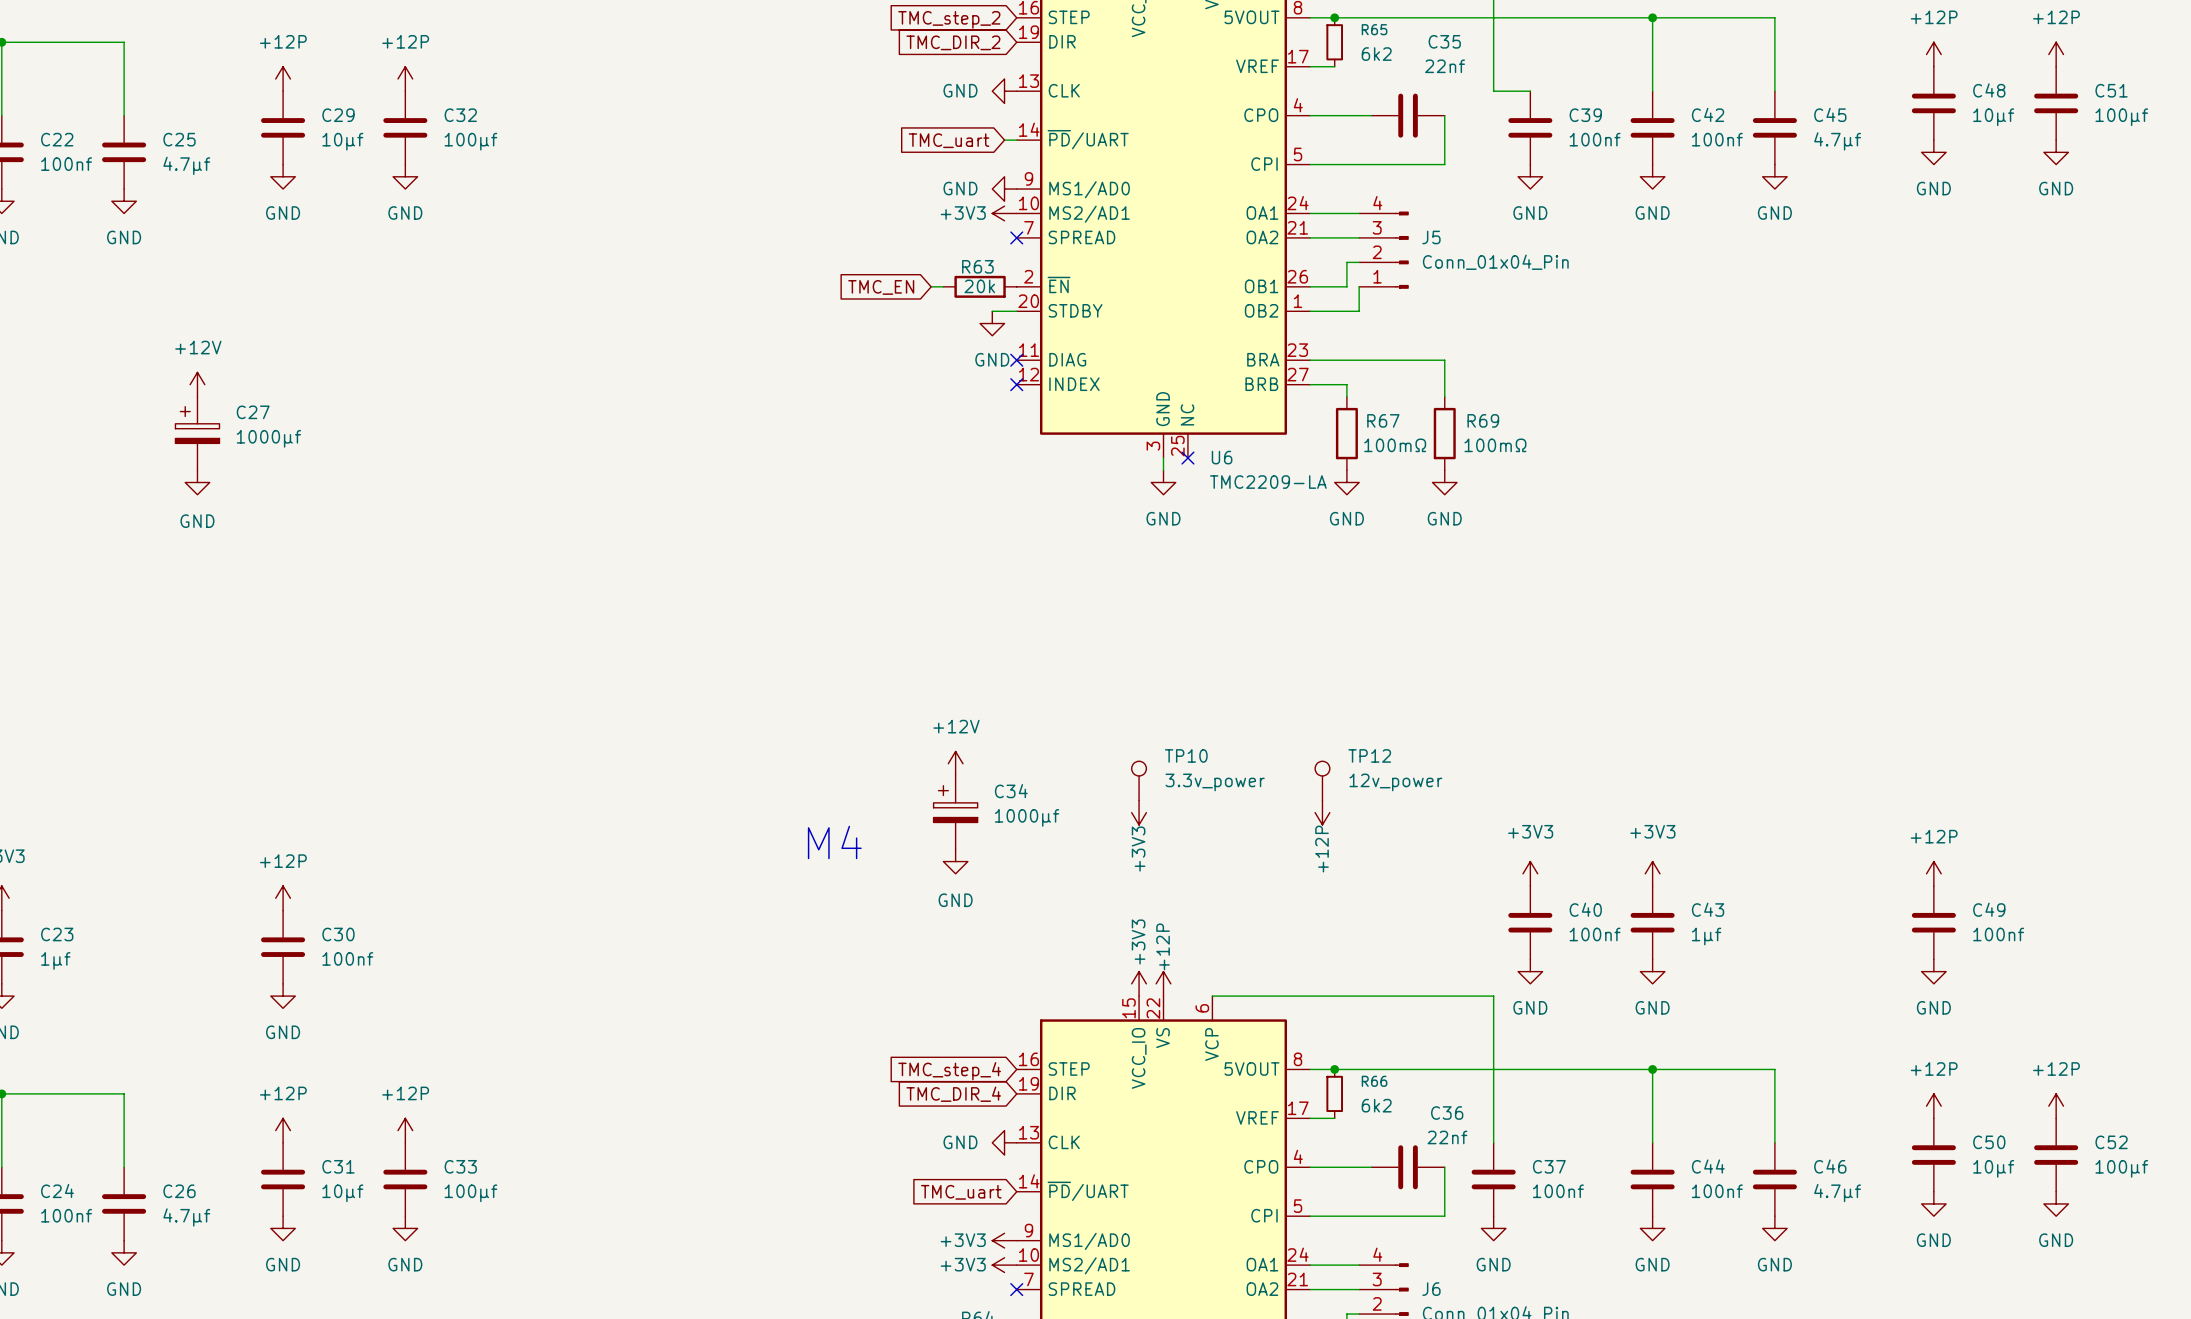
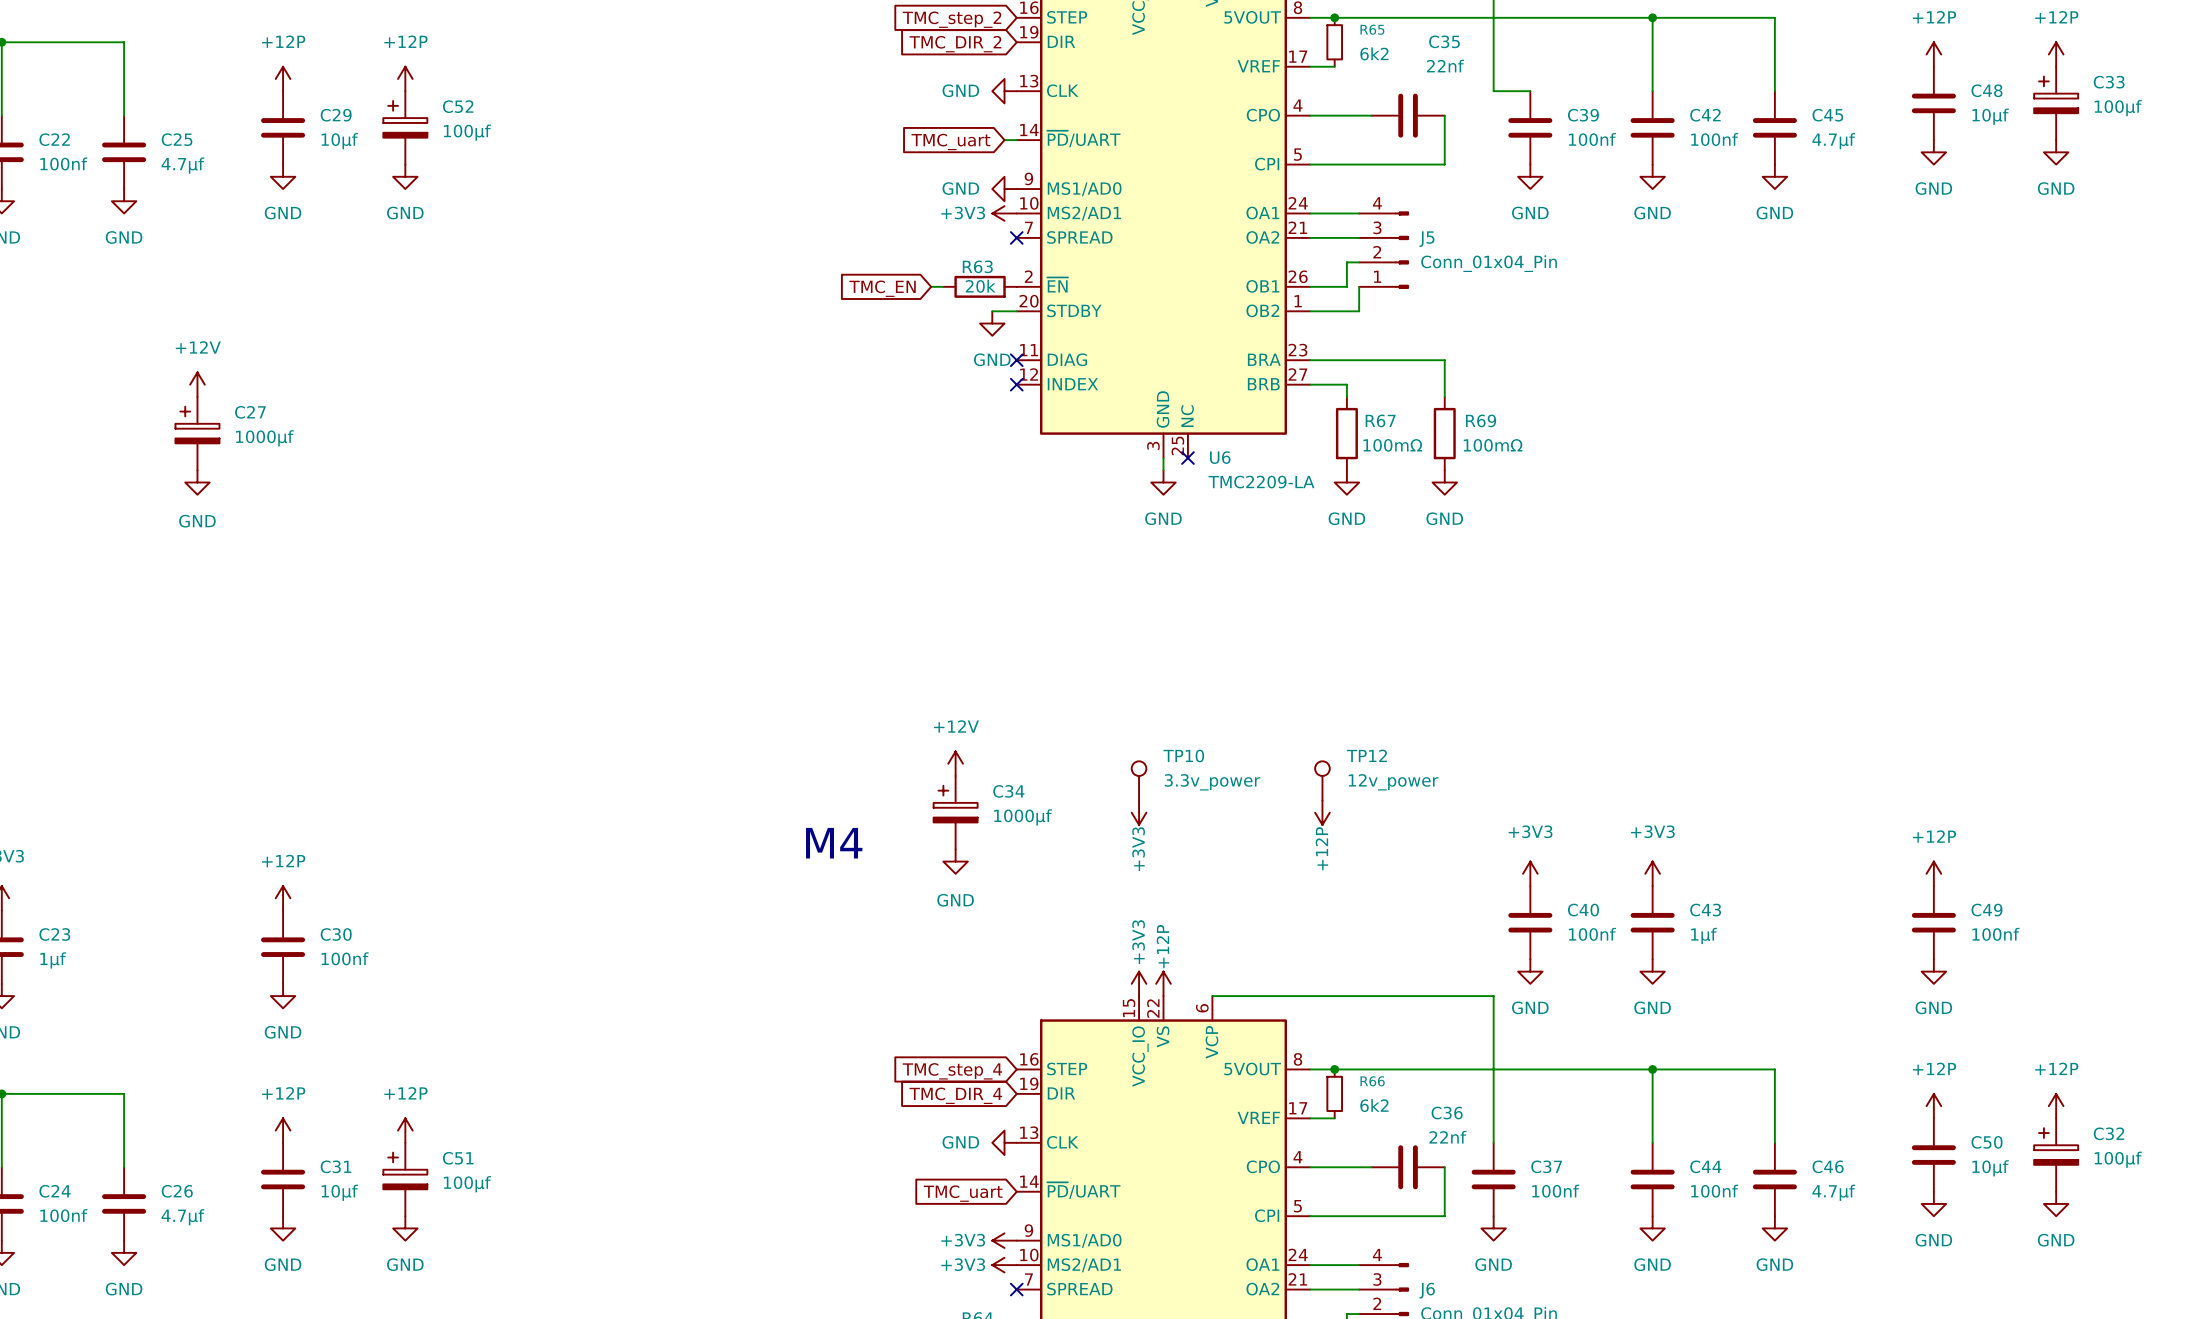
C51 symbol: [2034, 66, 2079, 141] -> [383, 1142, 428, 1217]
C32 symbol: [383, 91, 428, 165] -> [2034, 1118, 2079, 1192]
C52 symbol: [2034, 1118, 2079, 1192] -> [383, 91, 428, 165]
C33 symbol: [383, 1142, 428, 1217] -> [2034, 66, 2079, 141]

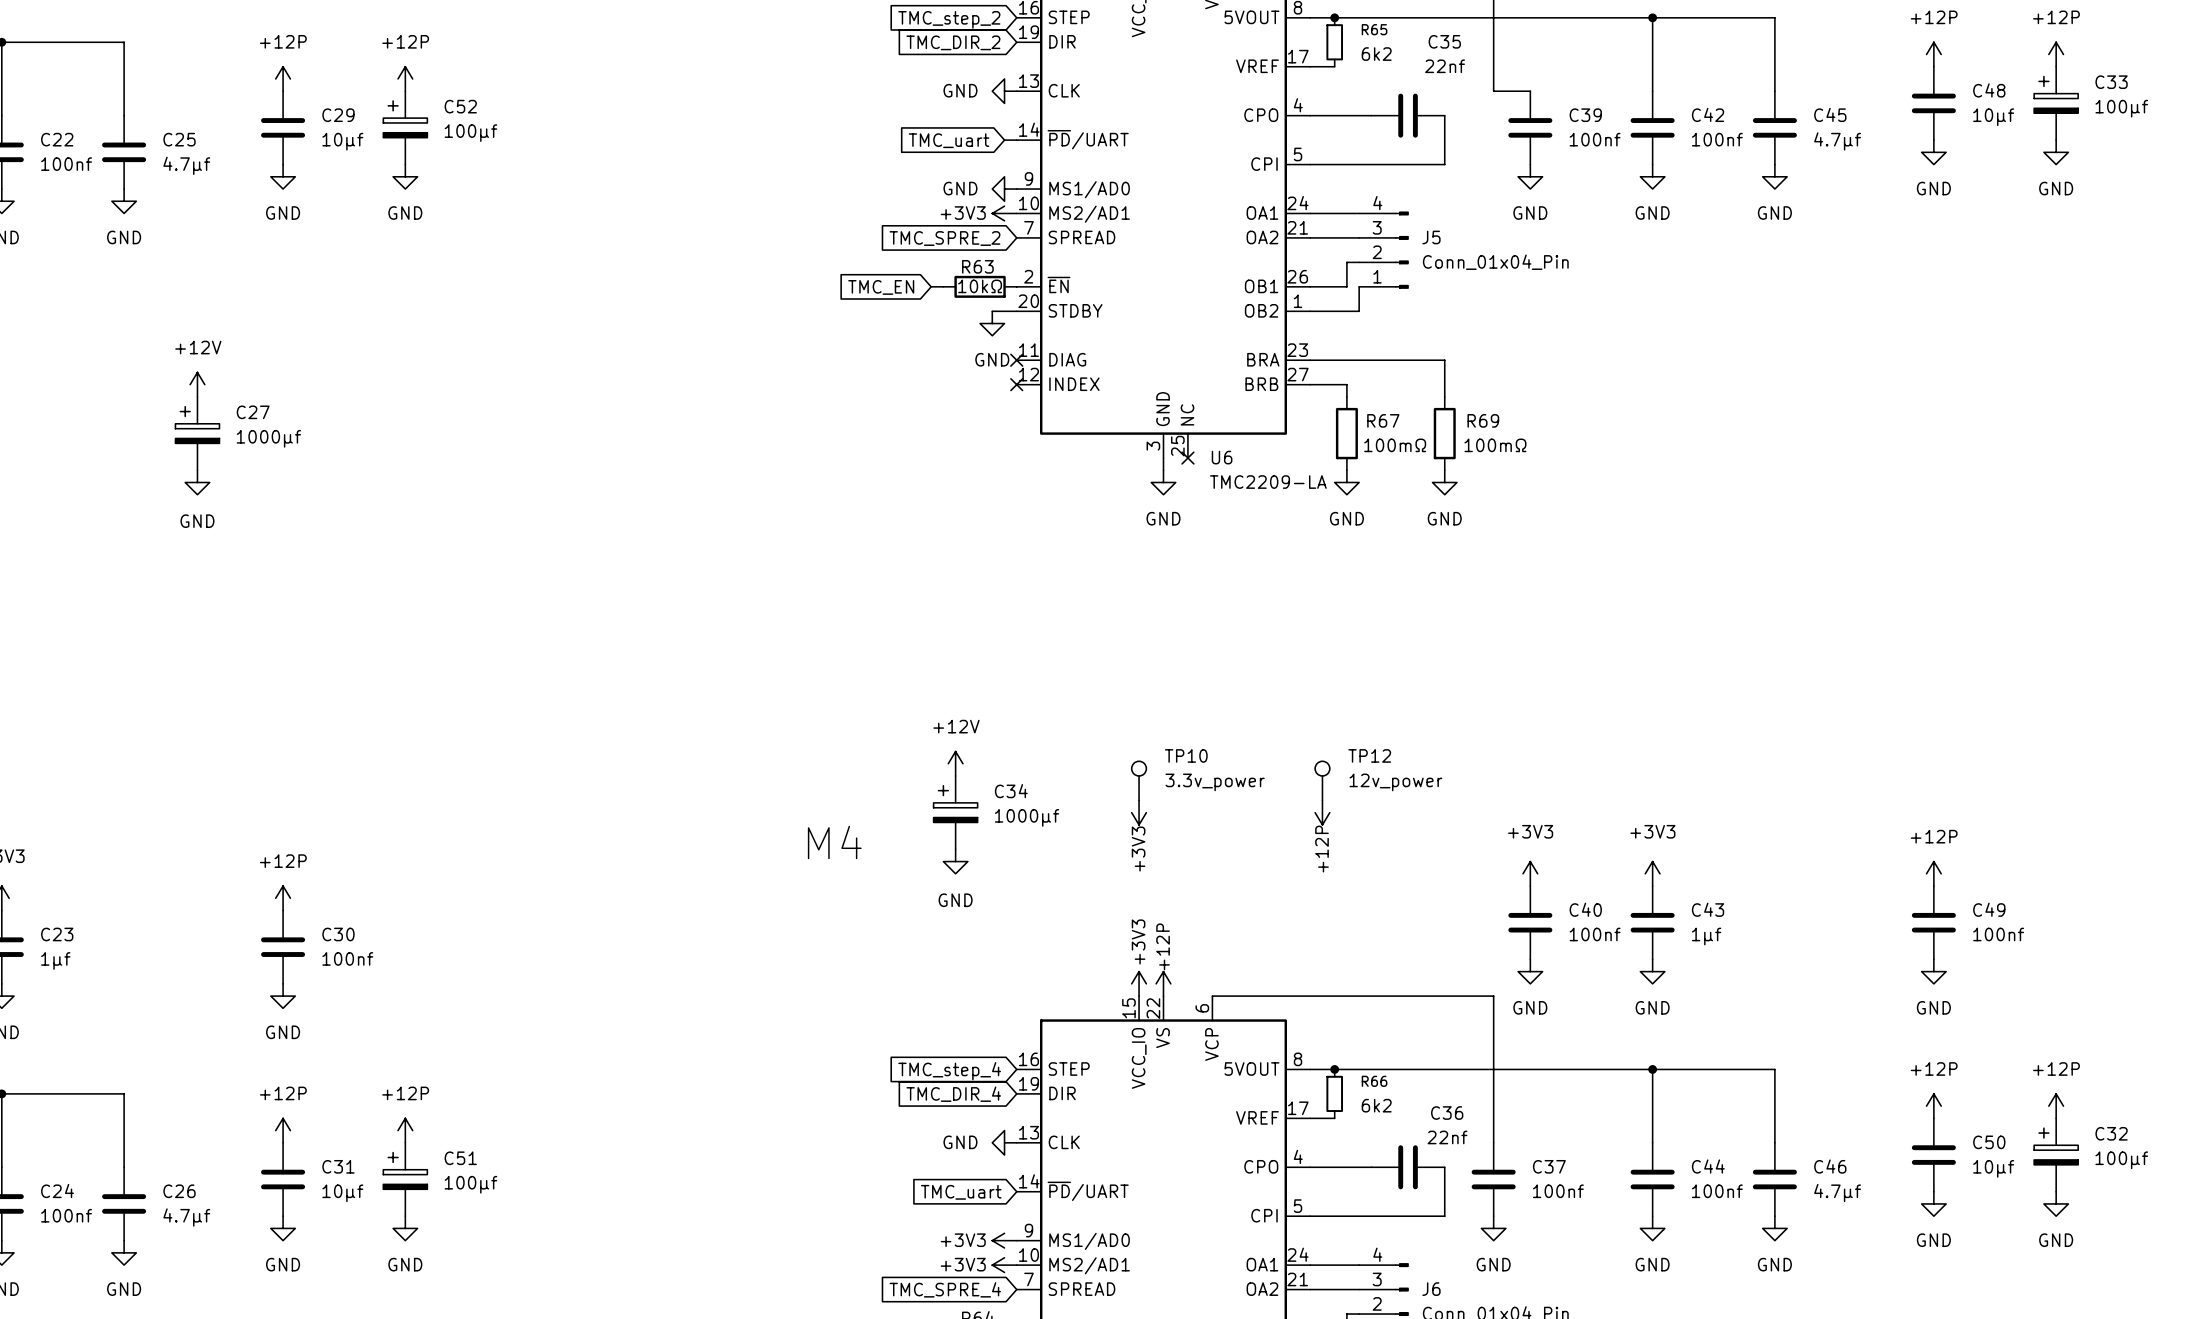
no-connect mark: (1016, 237) -> none
global label: none -> TMC_SPRE_2 (944, 238)
R63 value: 20k (980, 286) -> 10kΩ (980, 286)
no-connect mark: (1016, 1289) -> none
global label: none -> TMC_SPRE_4 (945, 1289)

